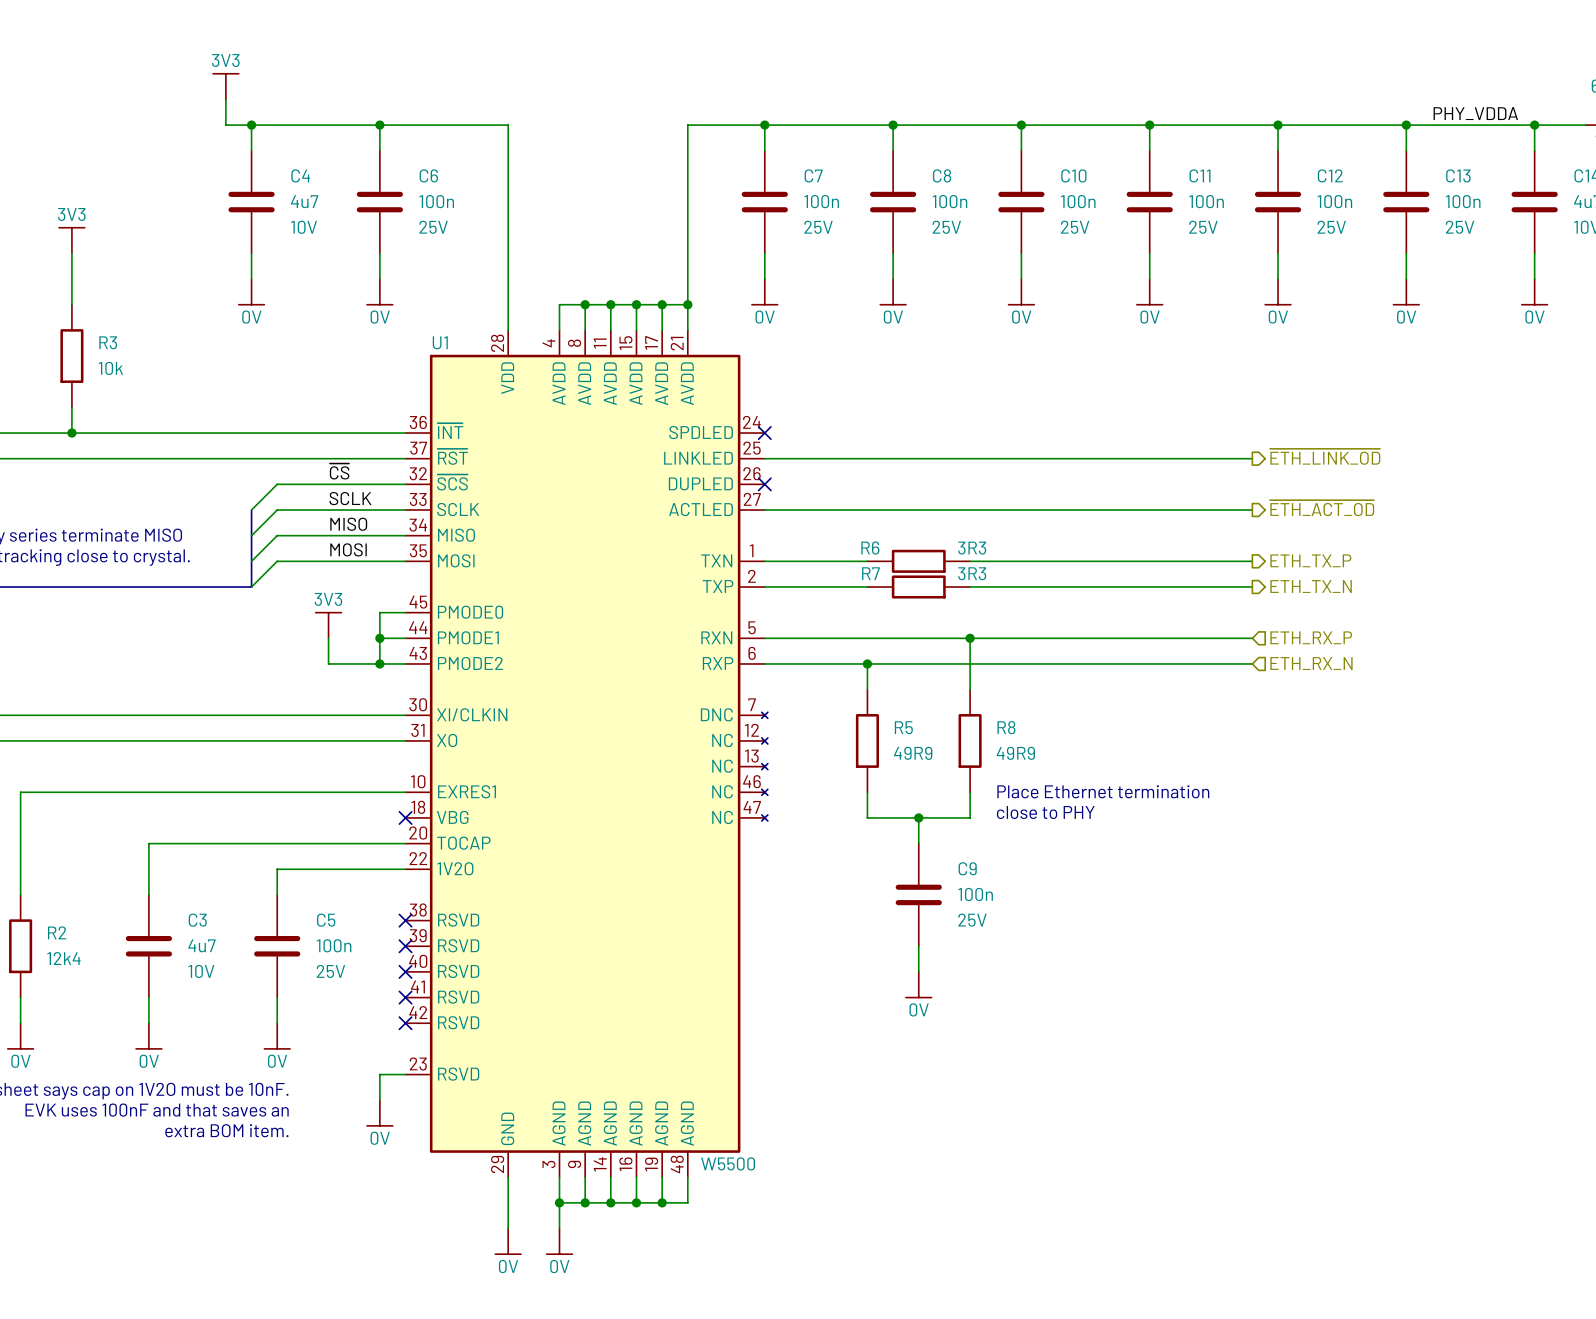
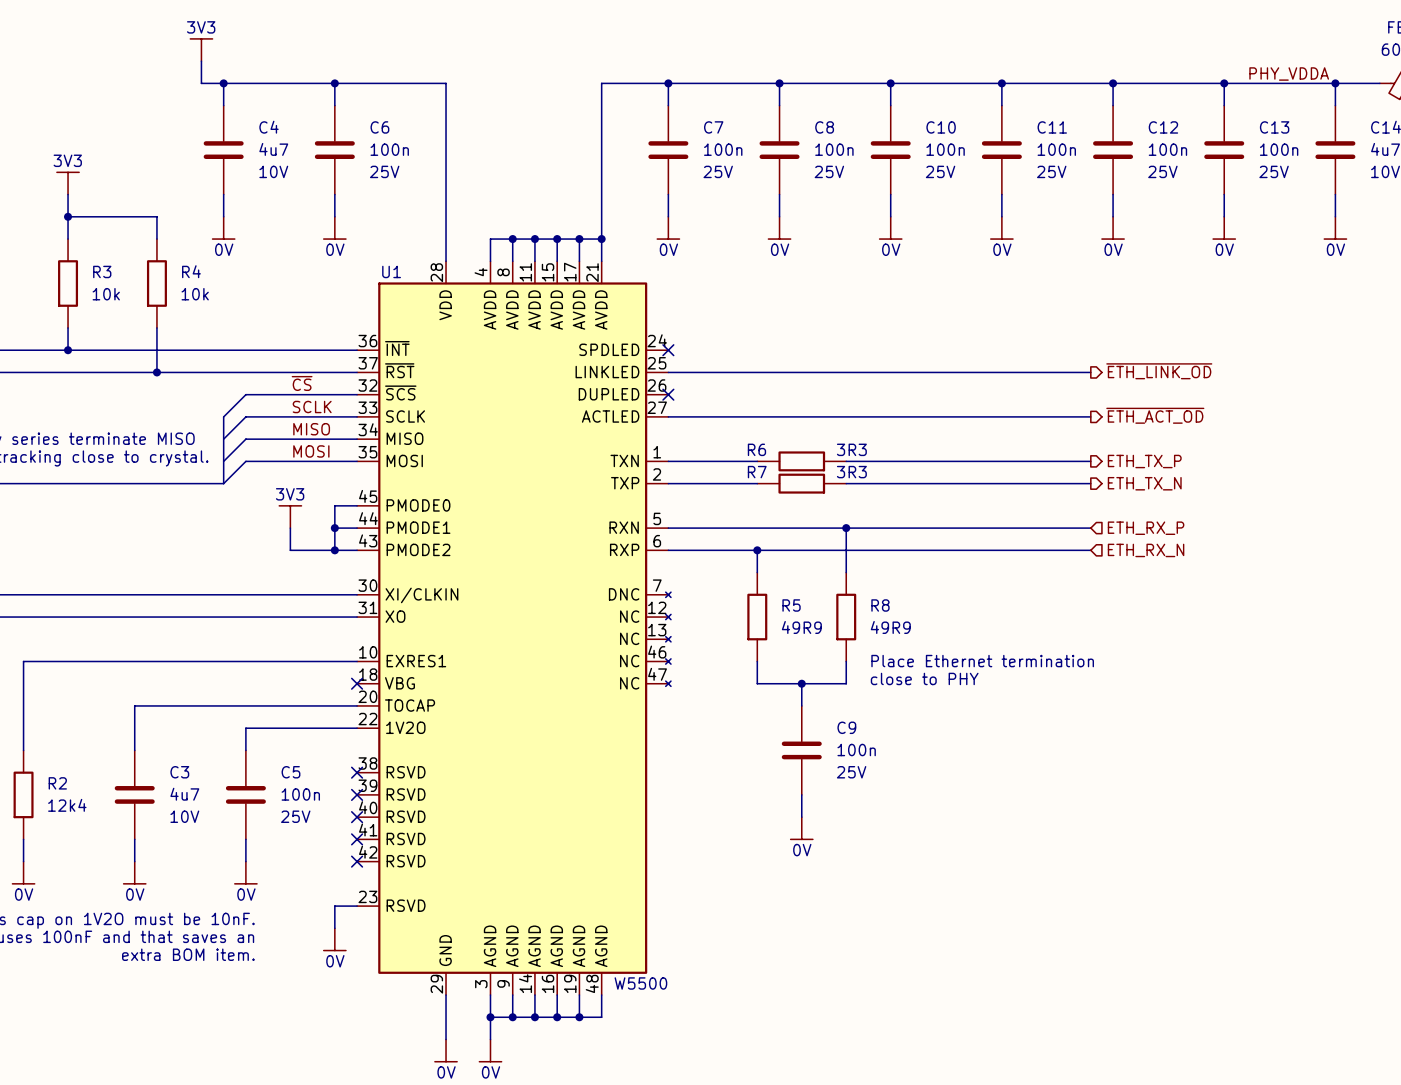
wire: none -> (68, 216) (156, 216) (156, 239)
junction: none -> (68, 216)
R4: none -> 10k (156, 283)
wire: none -> (156, 327) (156, 372)
junction: none -> (156, 372)

